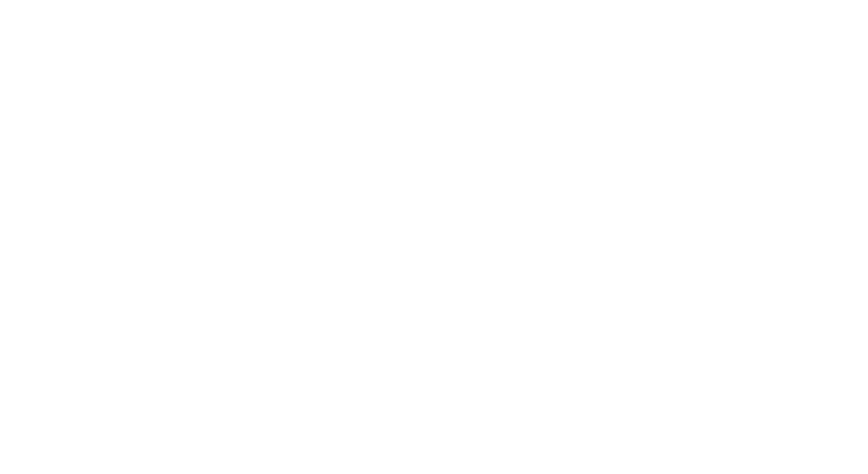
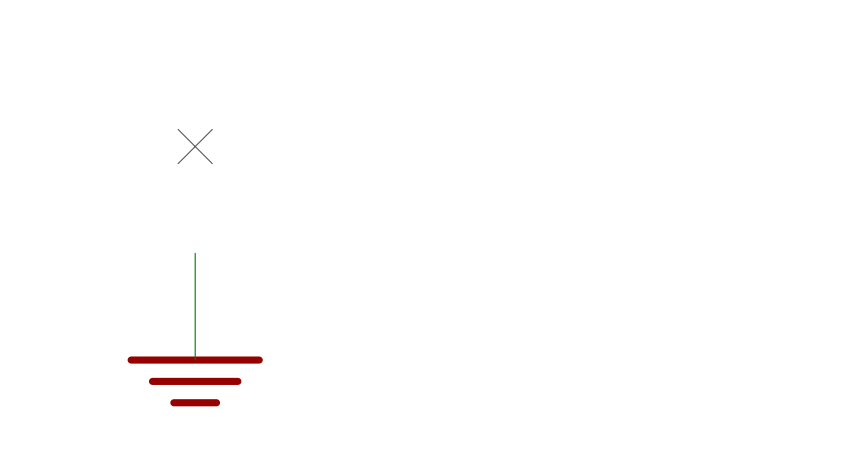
no-connect mark: none -> (195, 146)
wire: none -> (195, 253) (195, 360)
power symbol: none -> (195, 381)

